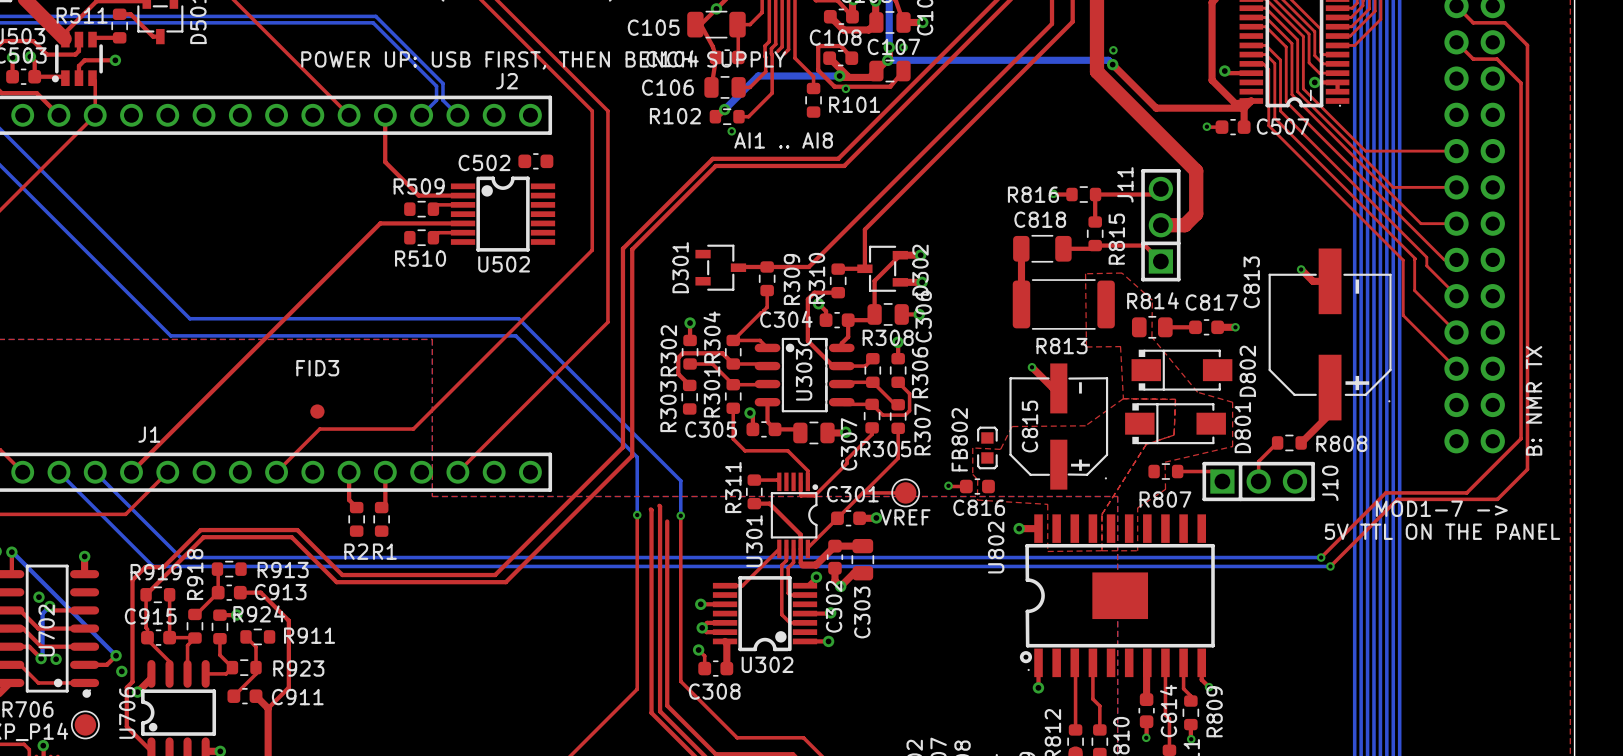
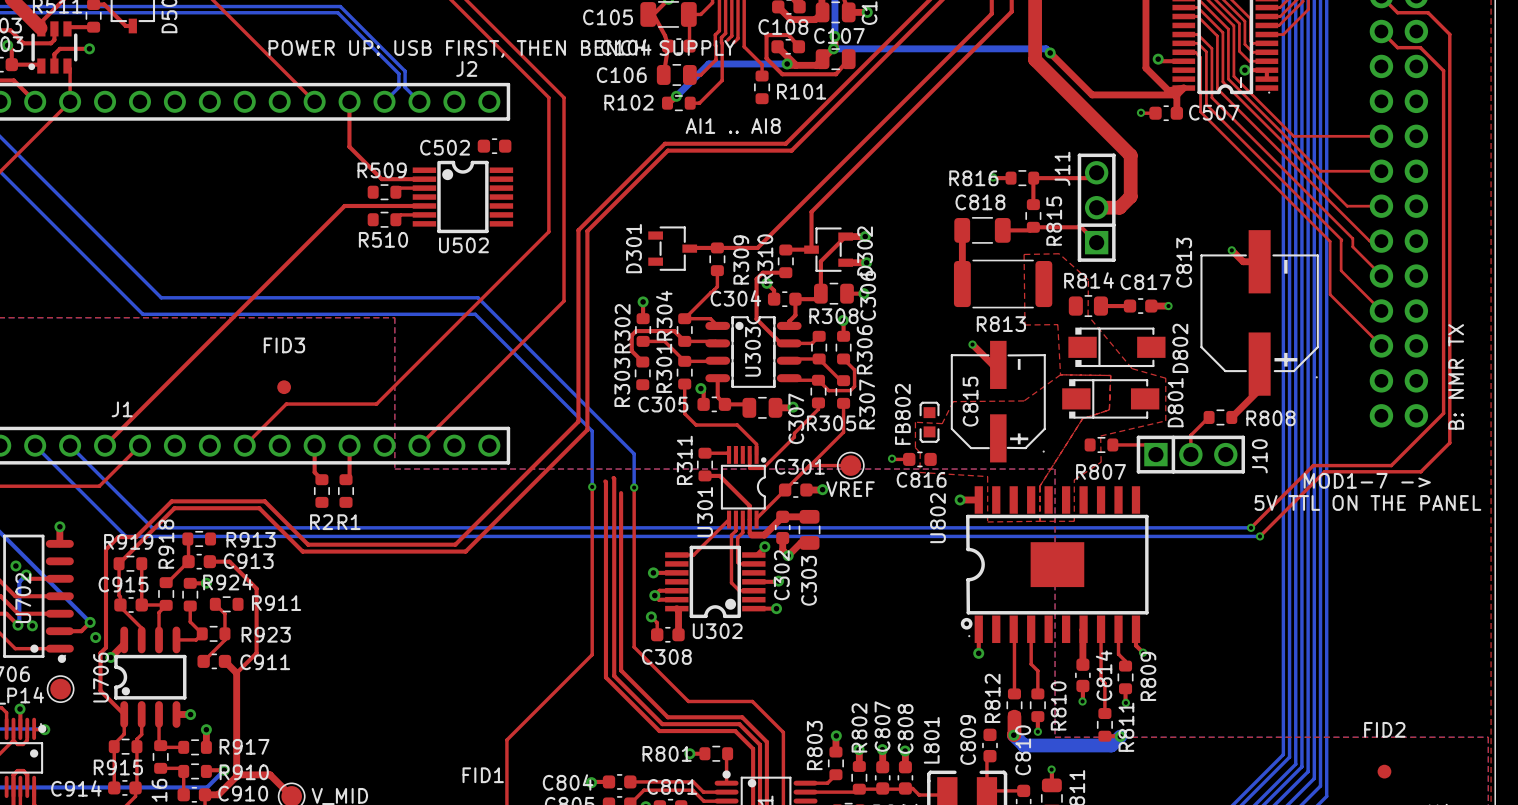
via: (903, 47) -> none
via: (1113, 50) -> none
via: (845, 88) -> none
via: (731, 131) -> none

